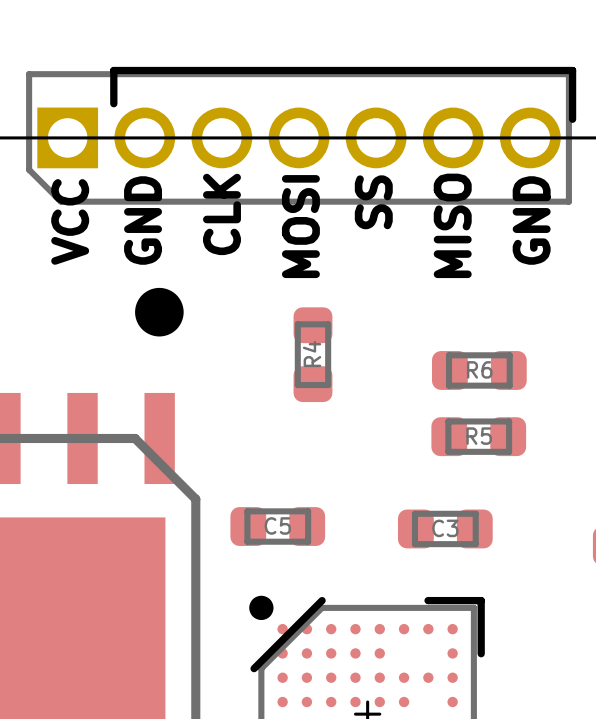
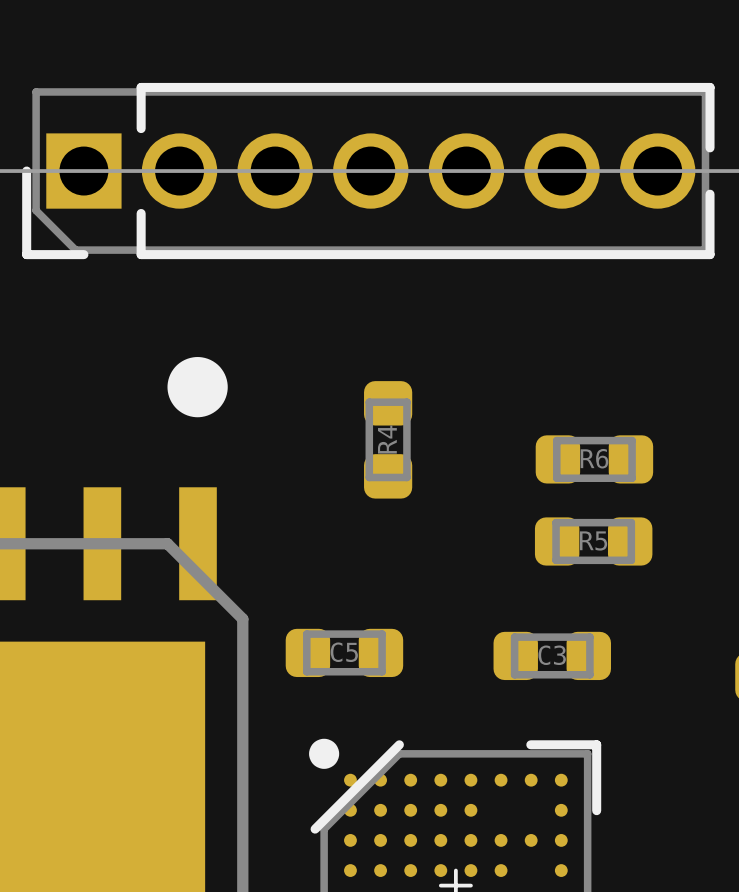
part footprint: [26, 66, 577, 205] -> [22, 82, 715, 260]
text: SS (373, 202) -> none
text: CLK (221, 214) -> none
text: GND (143, 220) -> none
text: GND (531, 220) -> none
text: VCC (70, 221) -> none
text: MISO (452, 225) -> none
text: MOSI (300, 226) -> none

